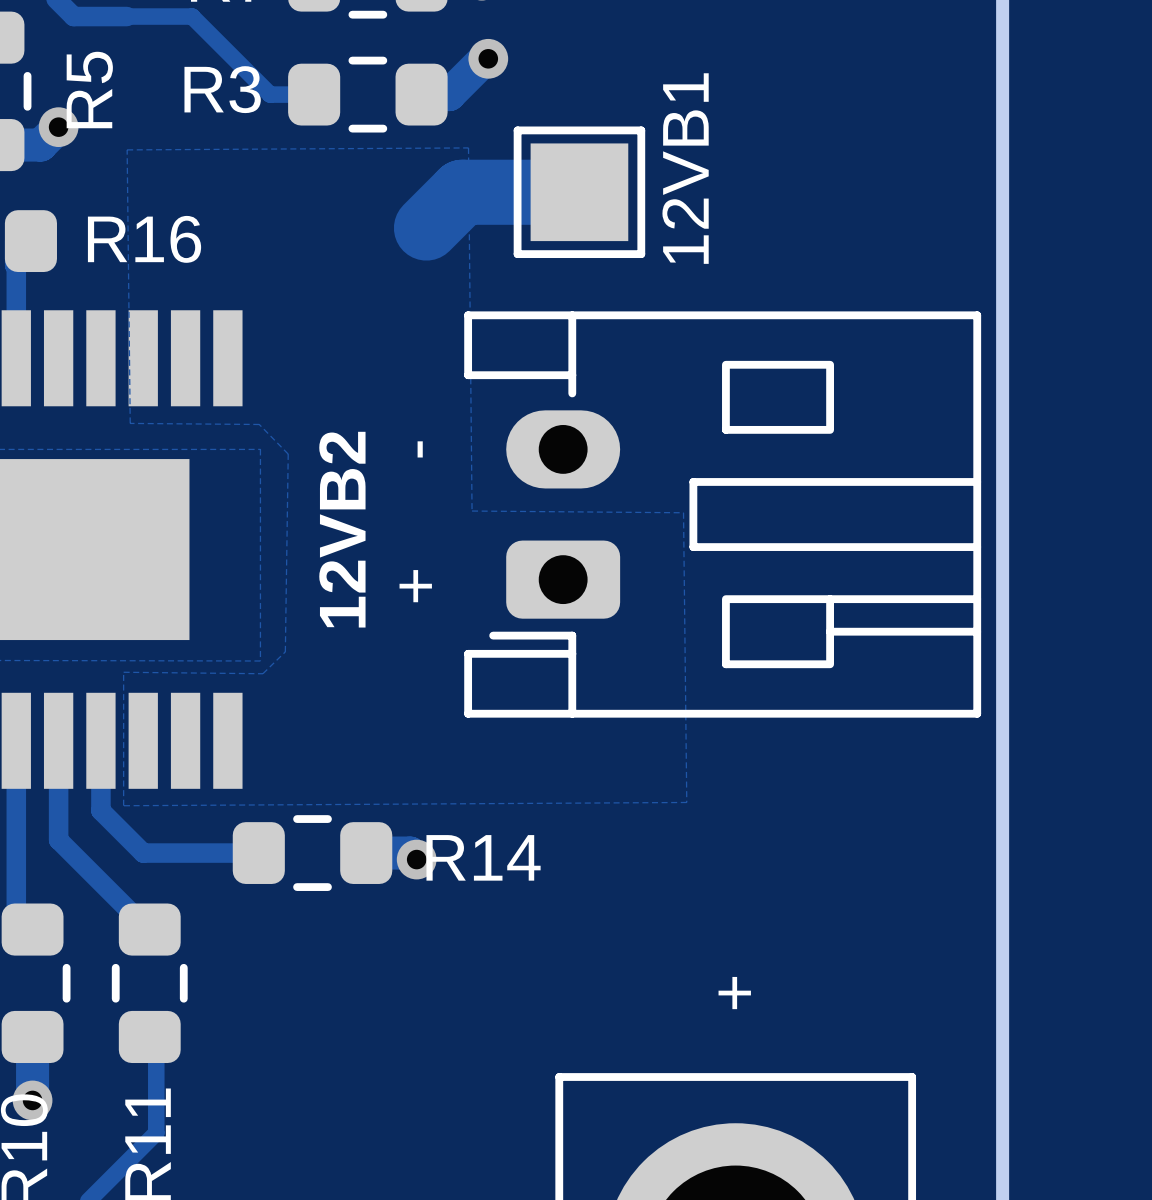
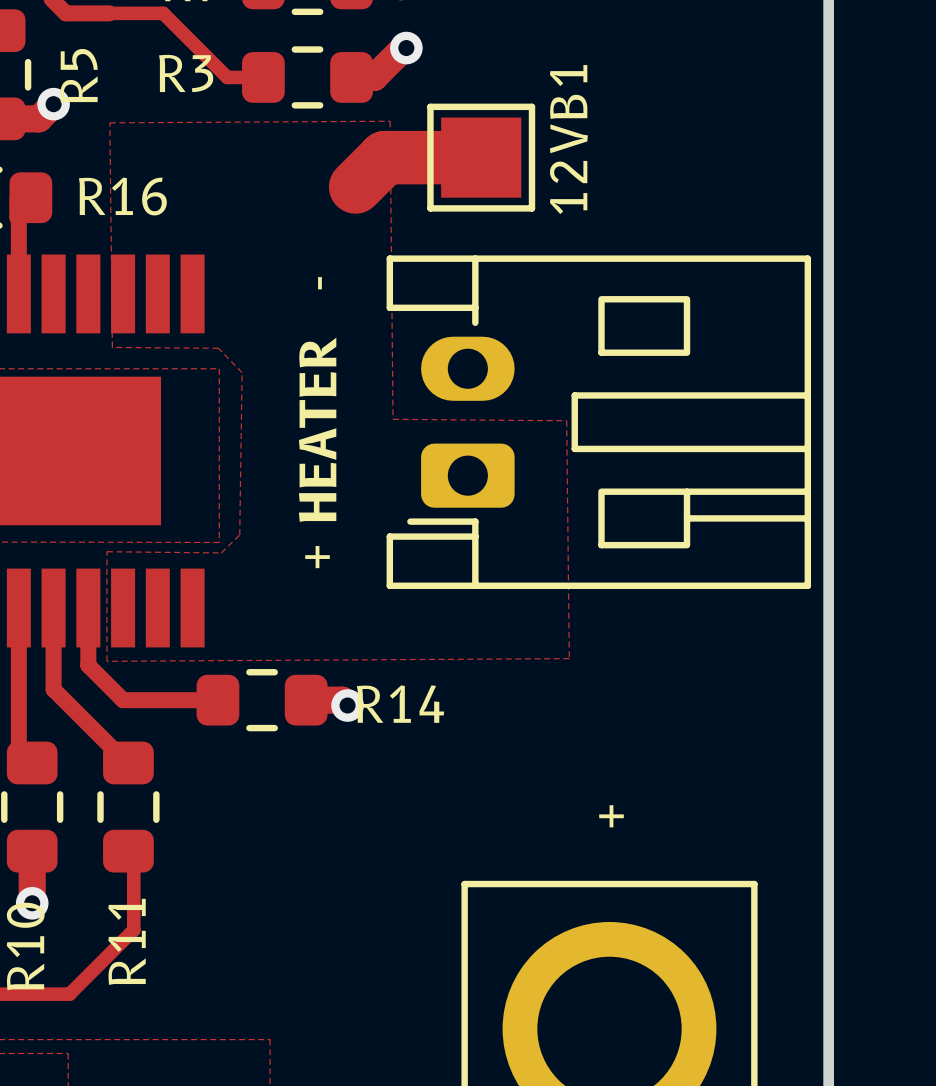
text position: - (420, 449) -> - (319, 283)
text: none -> HEATER (317, 429)
text: 12VB2 (342, 529) -> none
text position: + (415, 586) -> + (317, 557)

